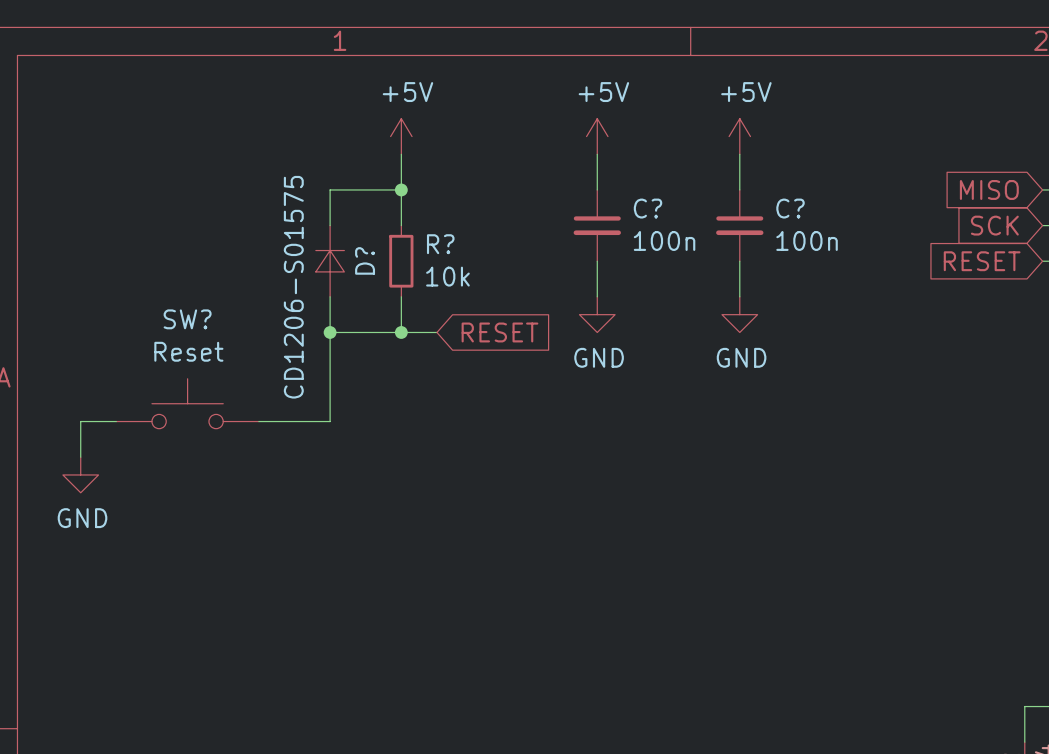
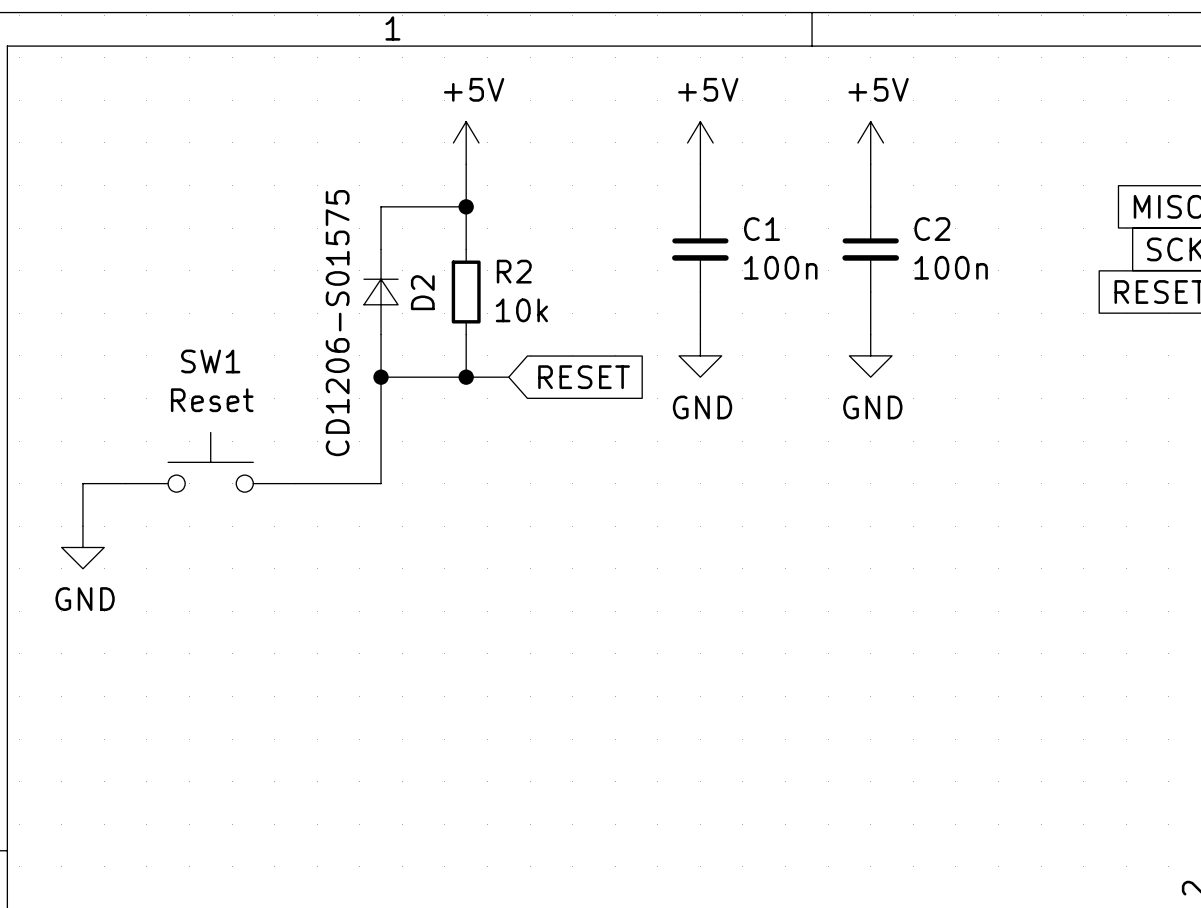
C? name: C? (648, 208) -> C1 (762, 229)
C? name: C? (790, 208) -> C2 (932, 229)
R? name: R? (440, 244) -> R2 (514, 271)
D? name: D? (365, 260) -> D2 (422, 292)
SW? name: SW? (187, 319) -> SW1 (210, 361)

